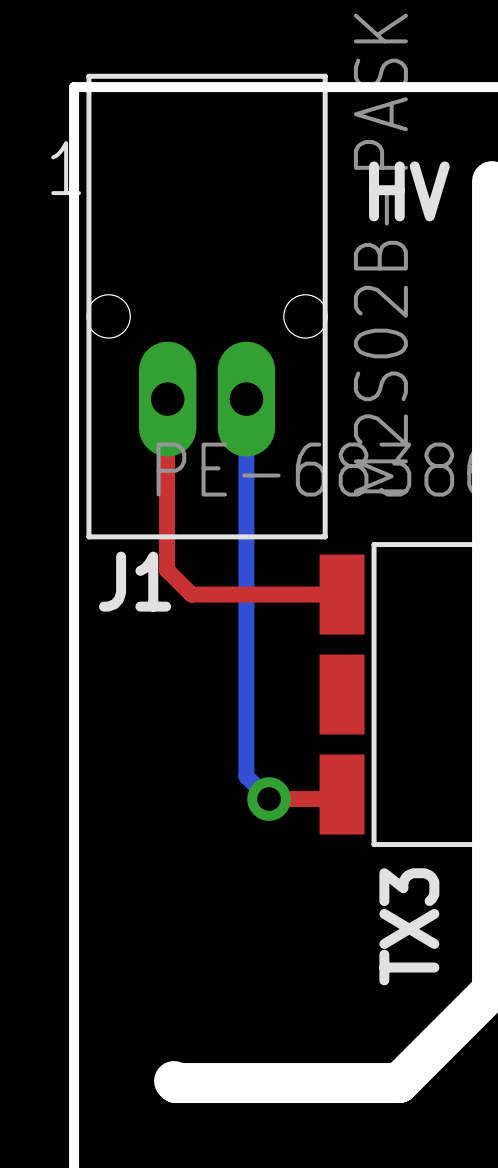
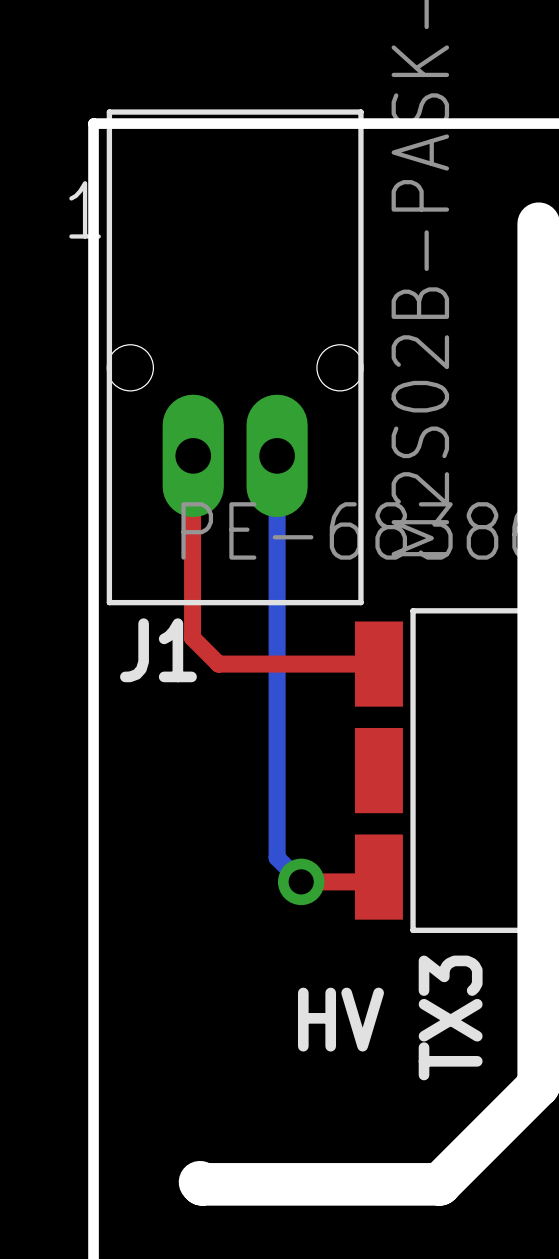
text position: HV (409, 191) -> HV (340, 1019)

